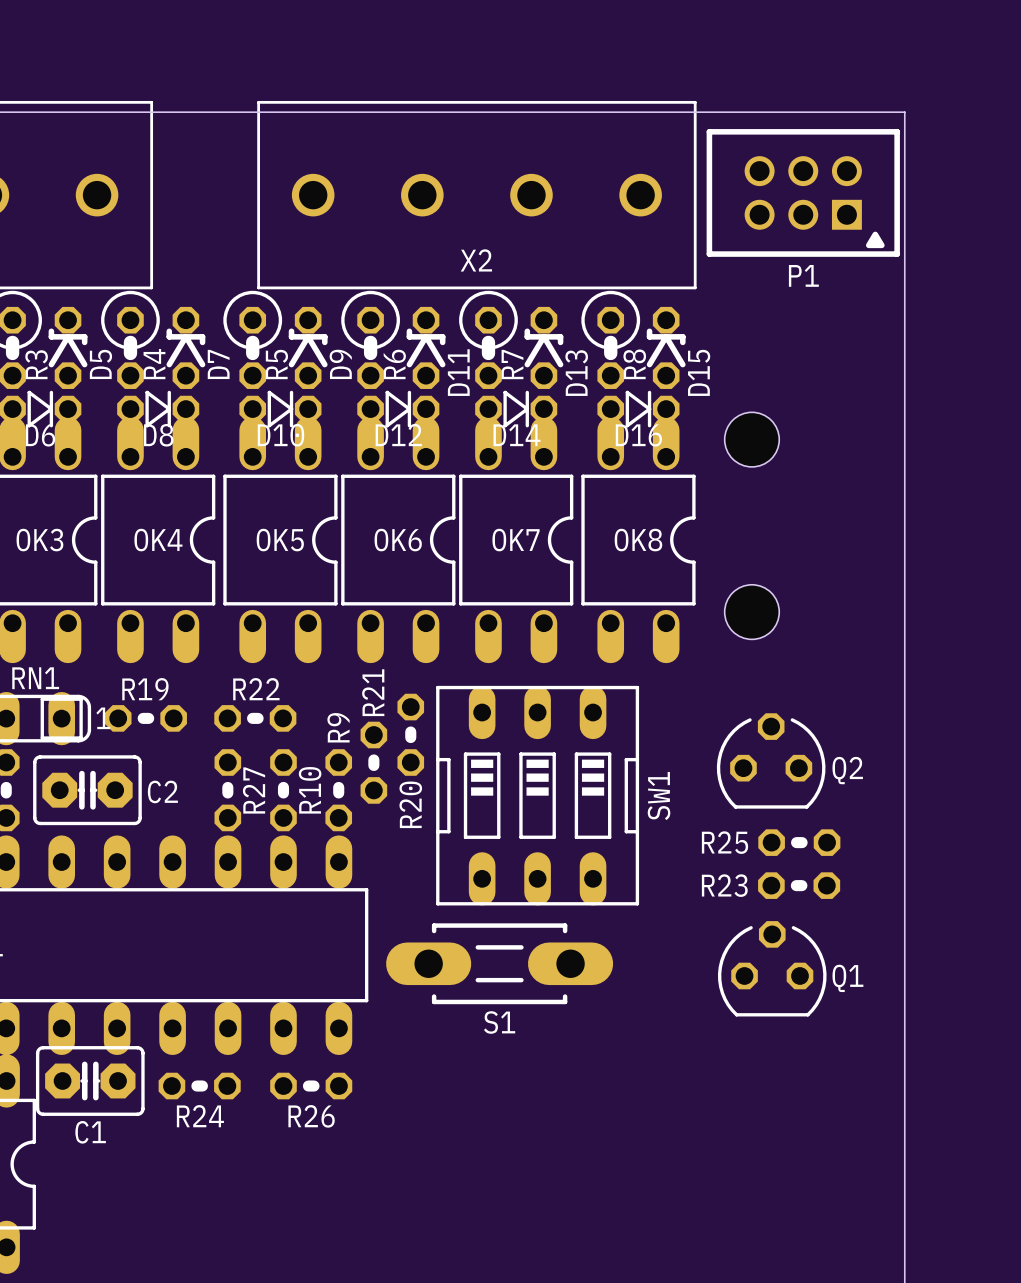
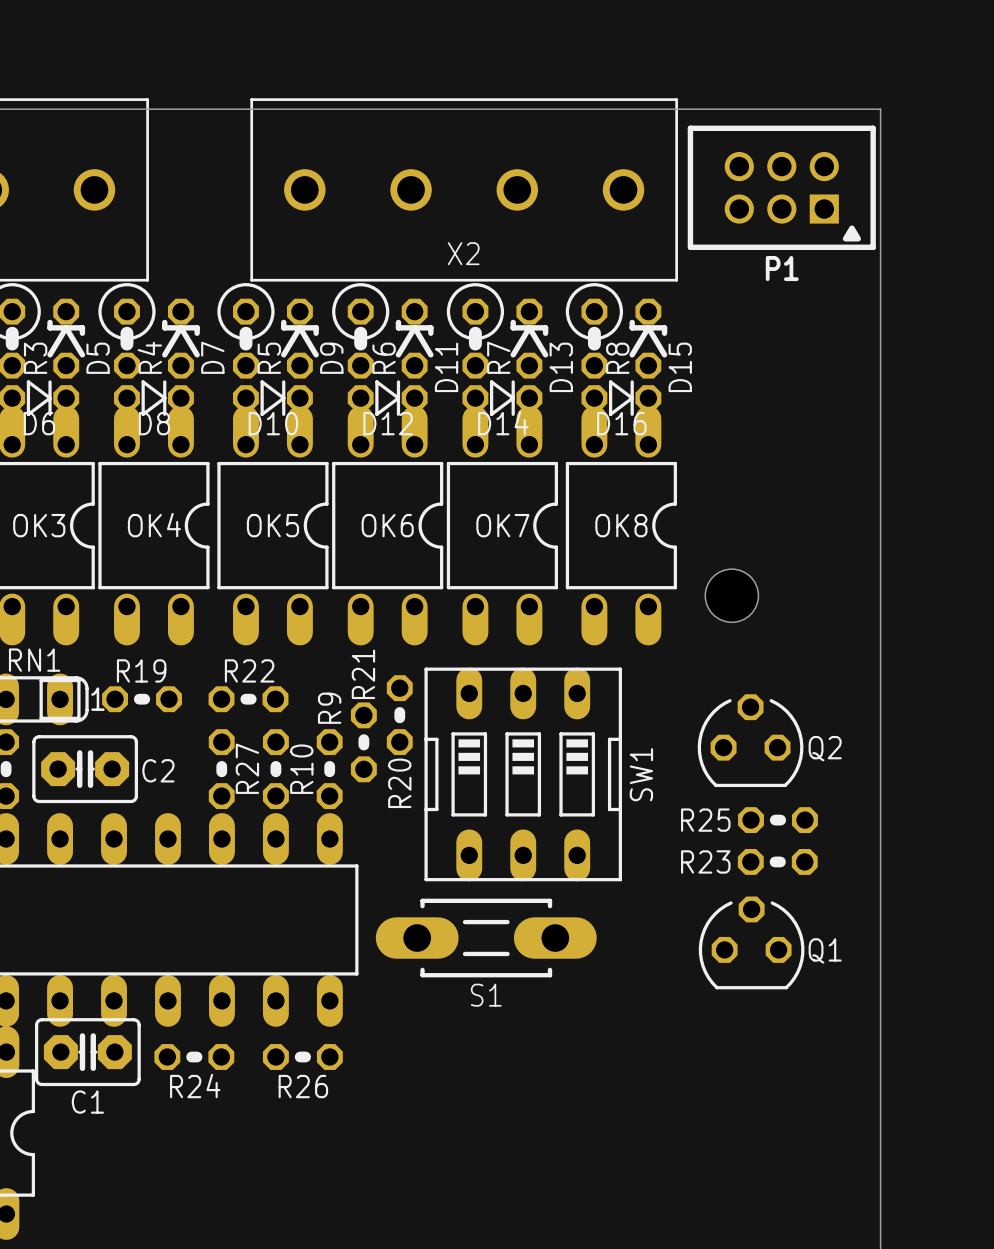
hole: (751, 439) -> none

